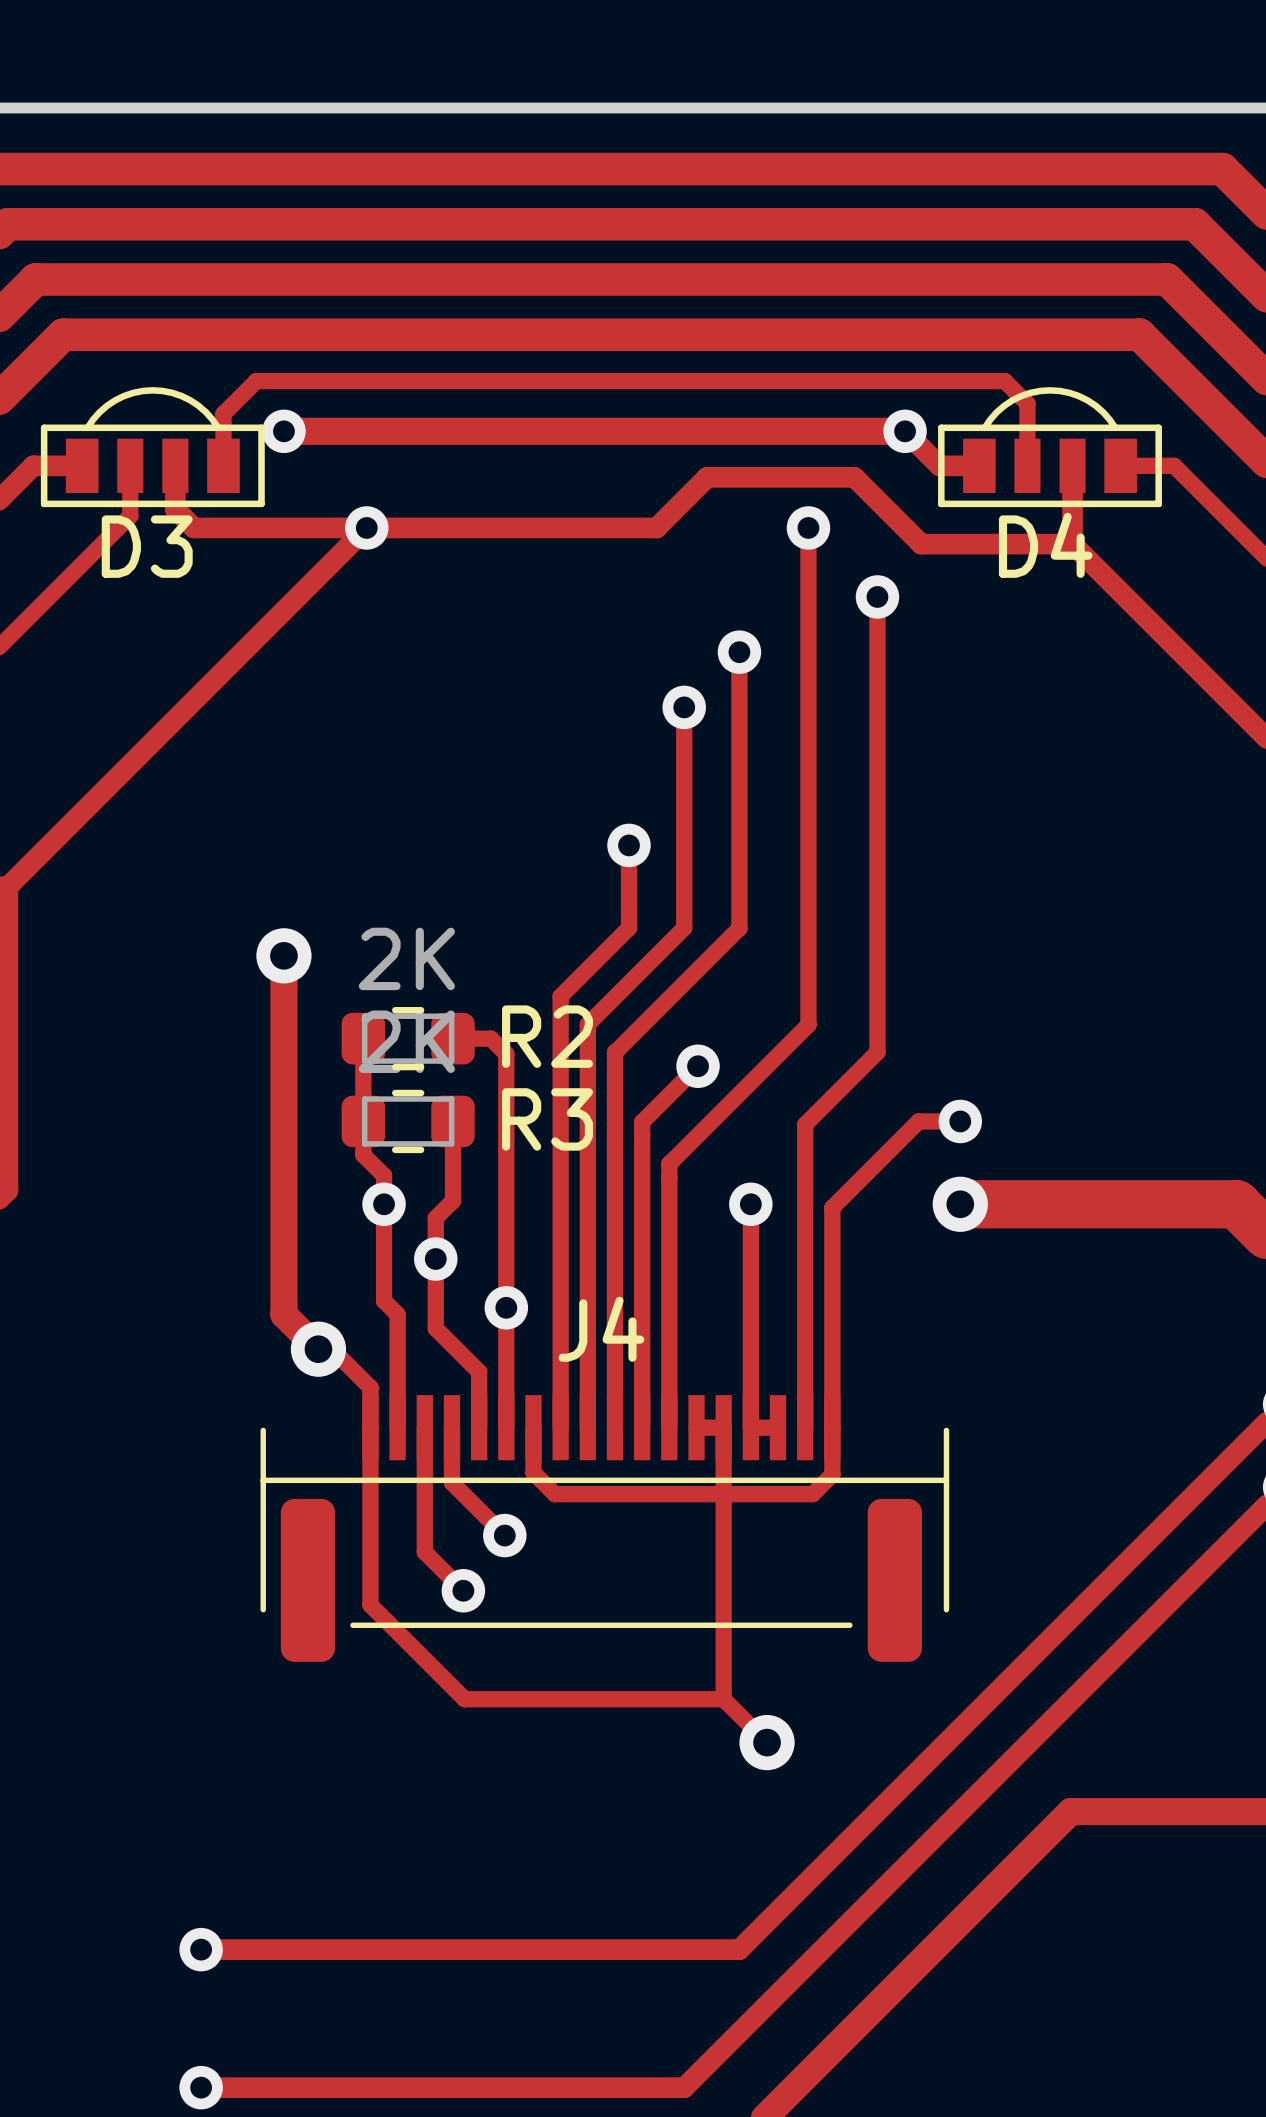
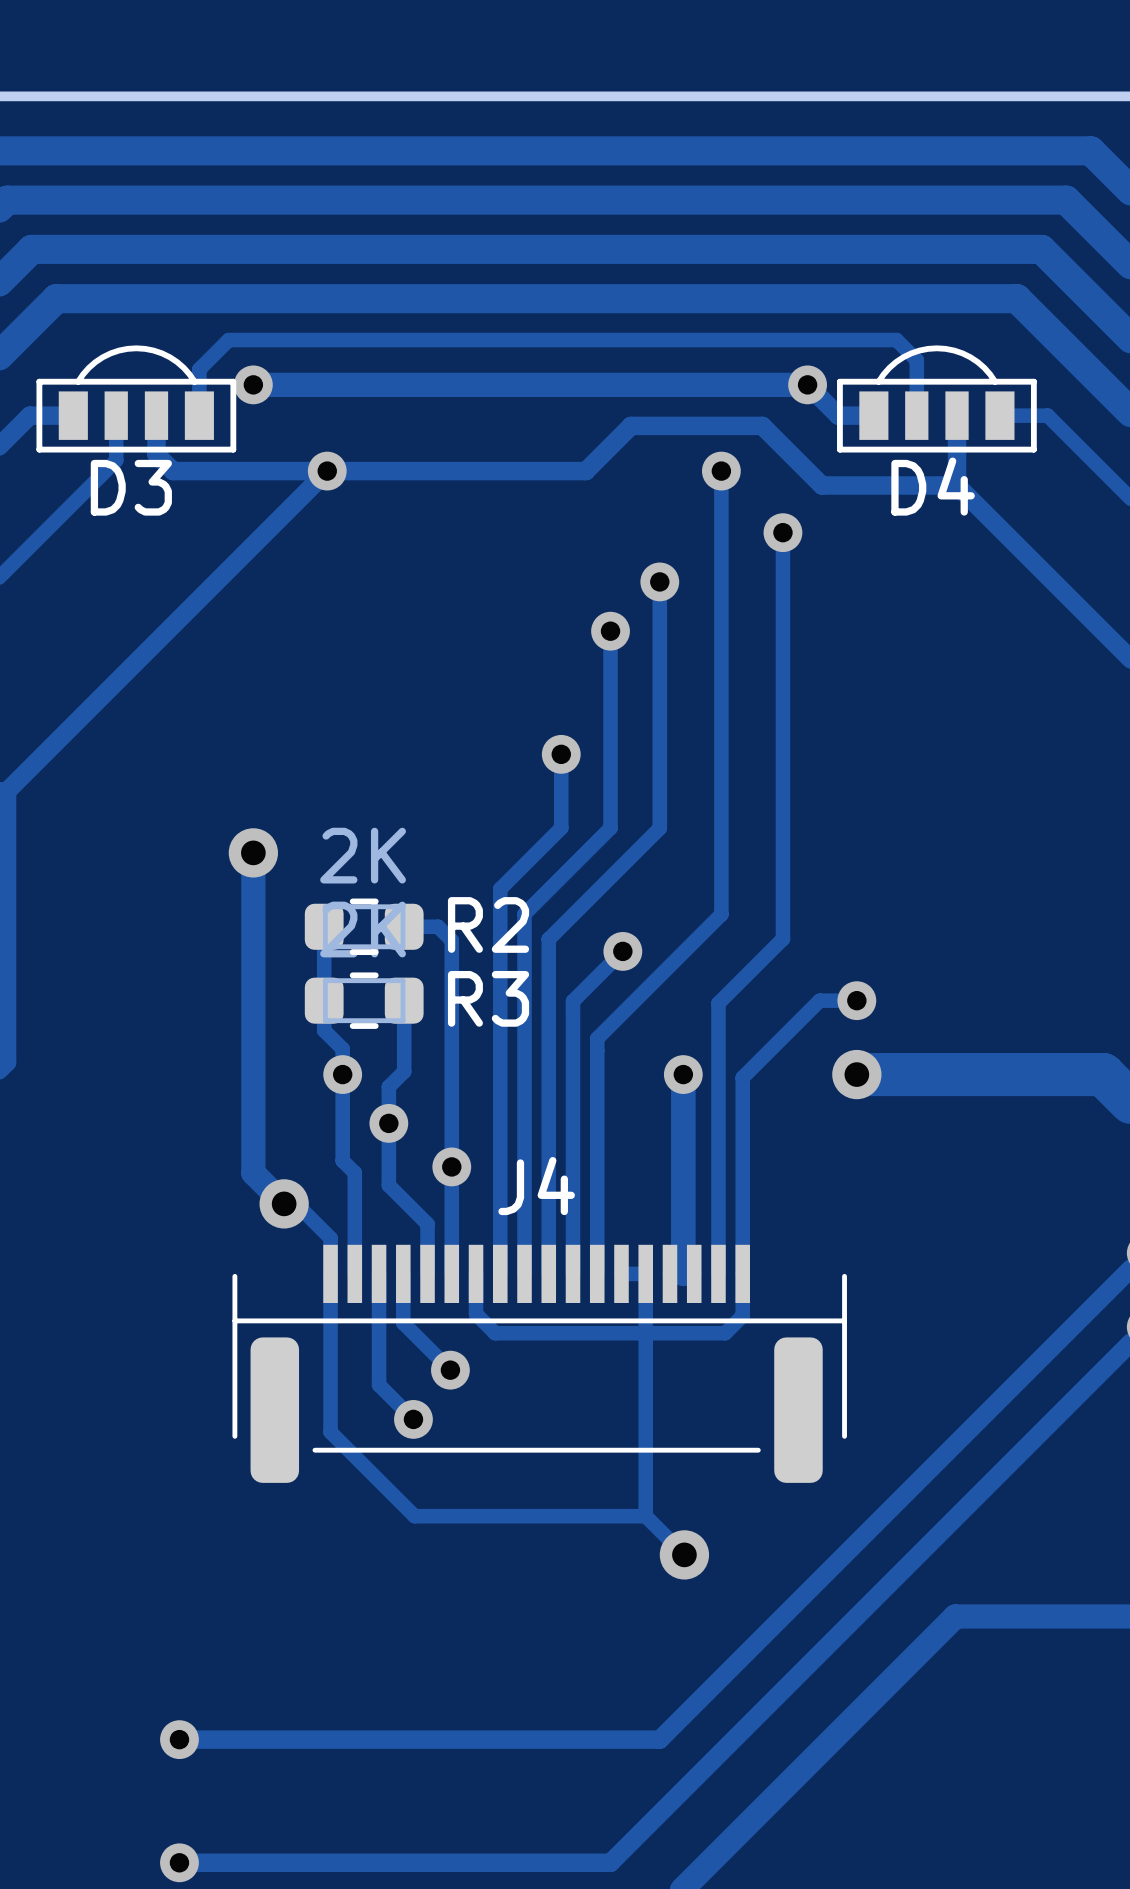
track: (750, 1204) (750, 1427) -> (683, 1074) (683, 1273)
via position: (750, 1204) -> (683, 1074)

